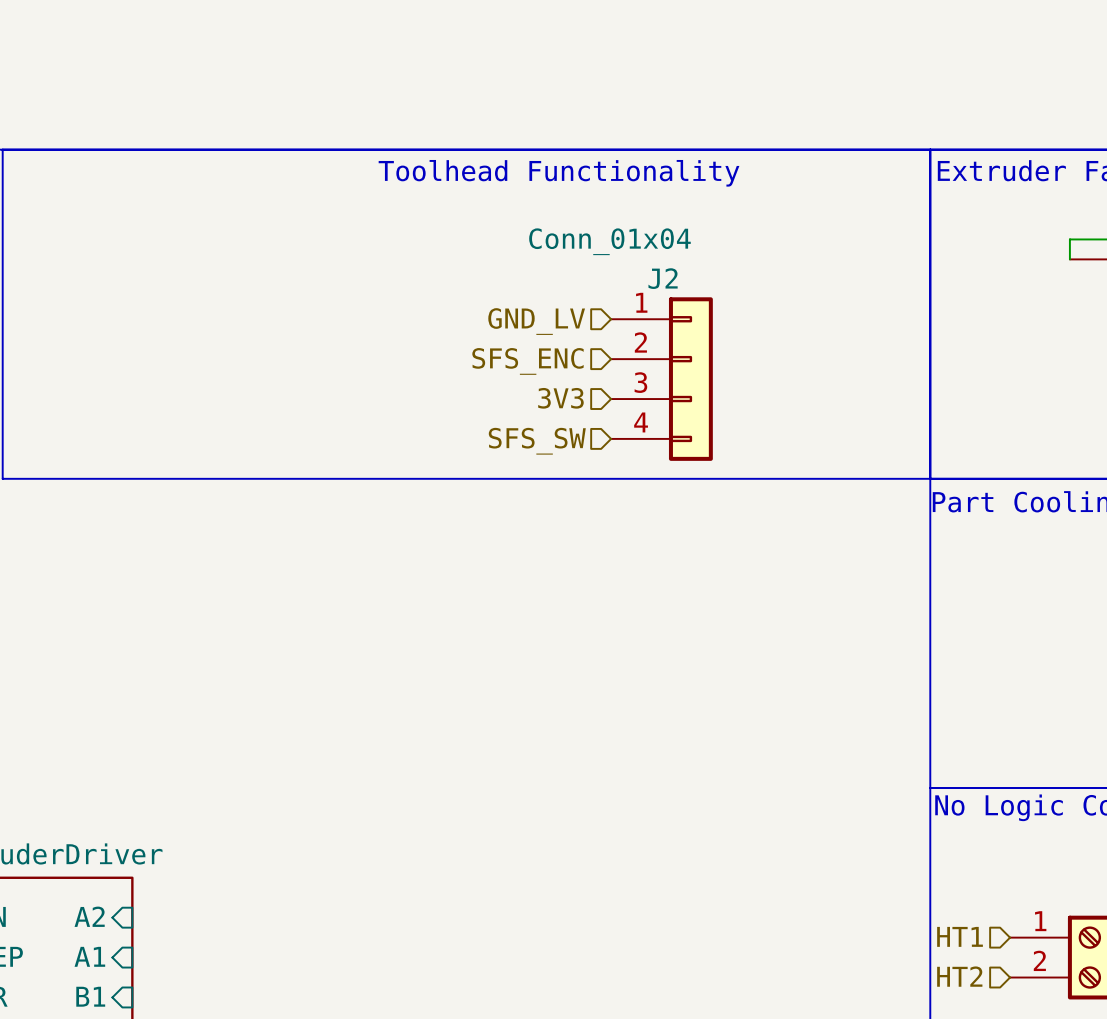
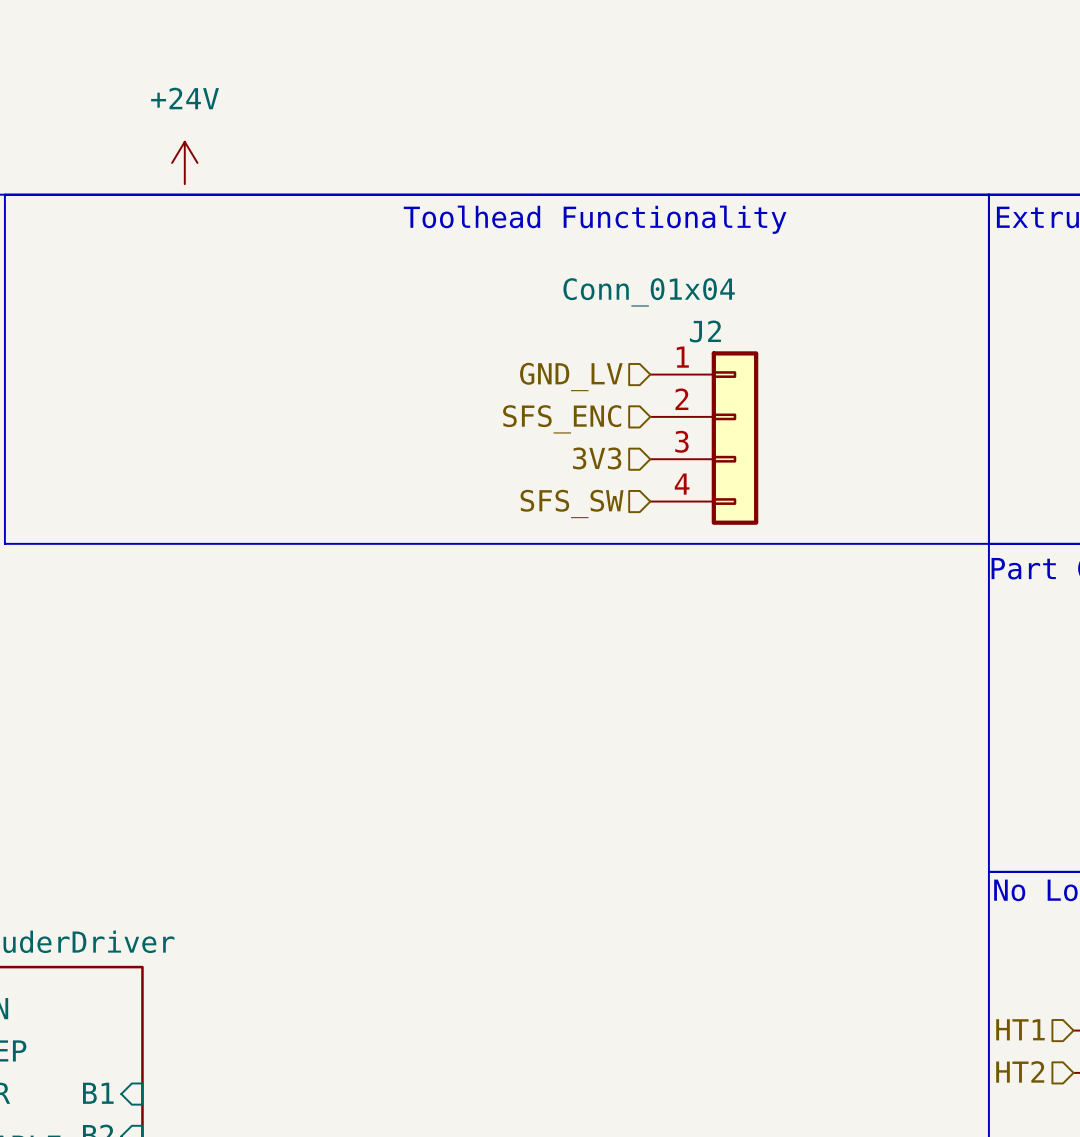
power symbol: none -> +24V (184, 162)
sheet pin: A2 (89, 916) -> none
sheet pin: A1 (89, 956) -> none

